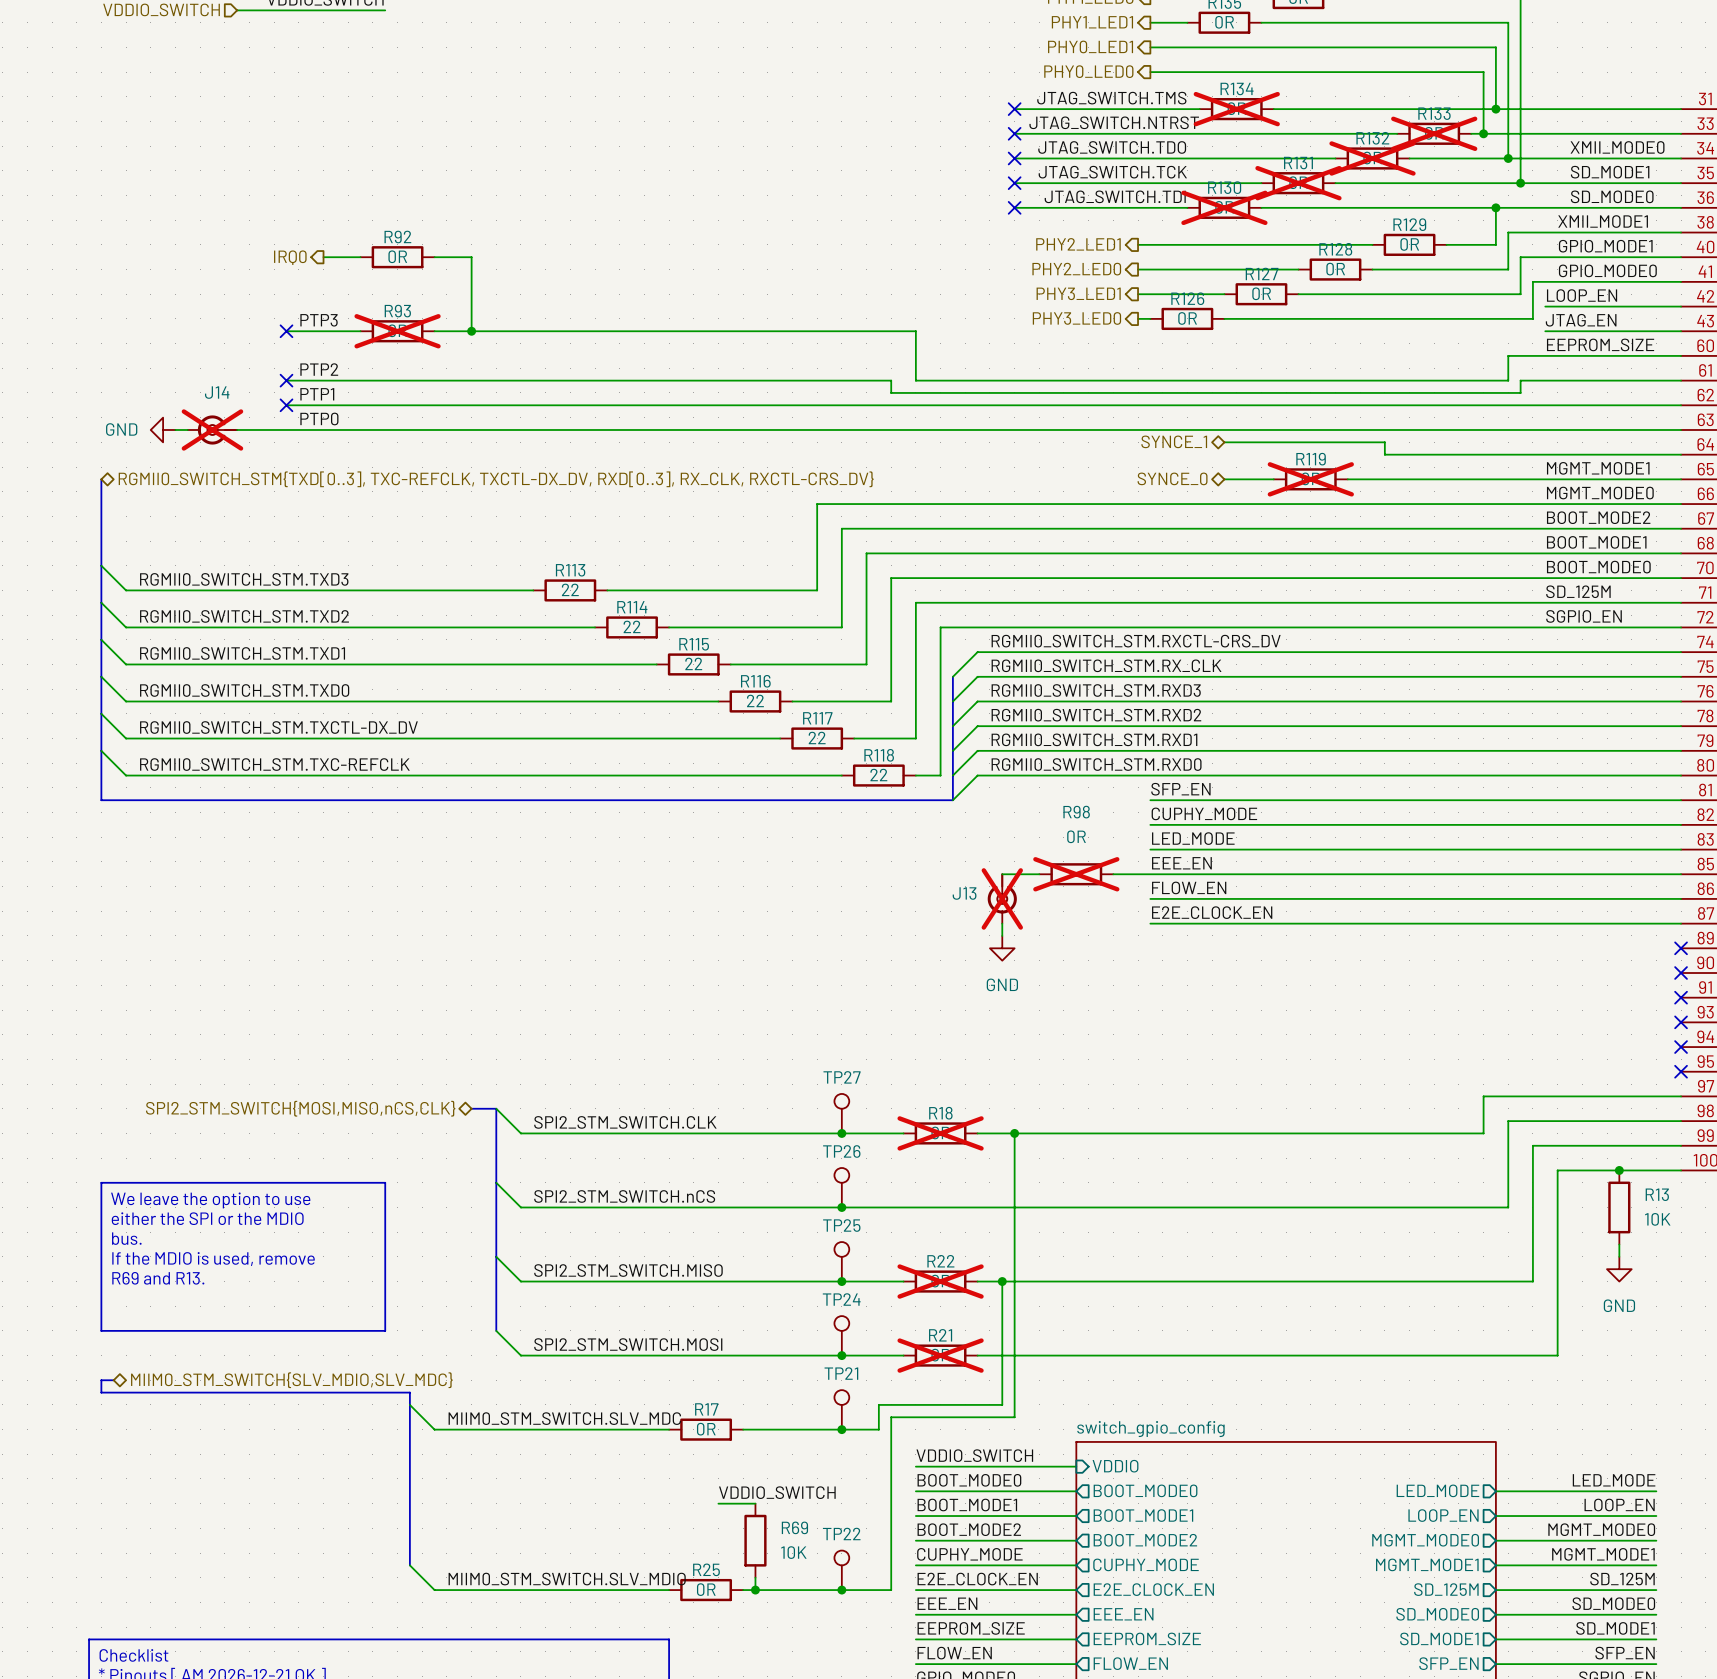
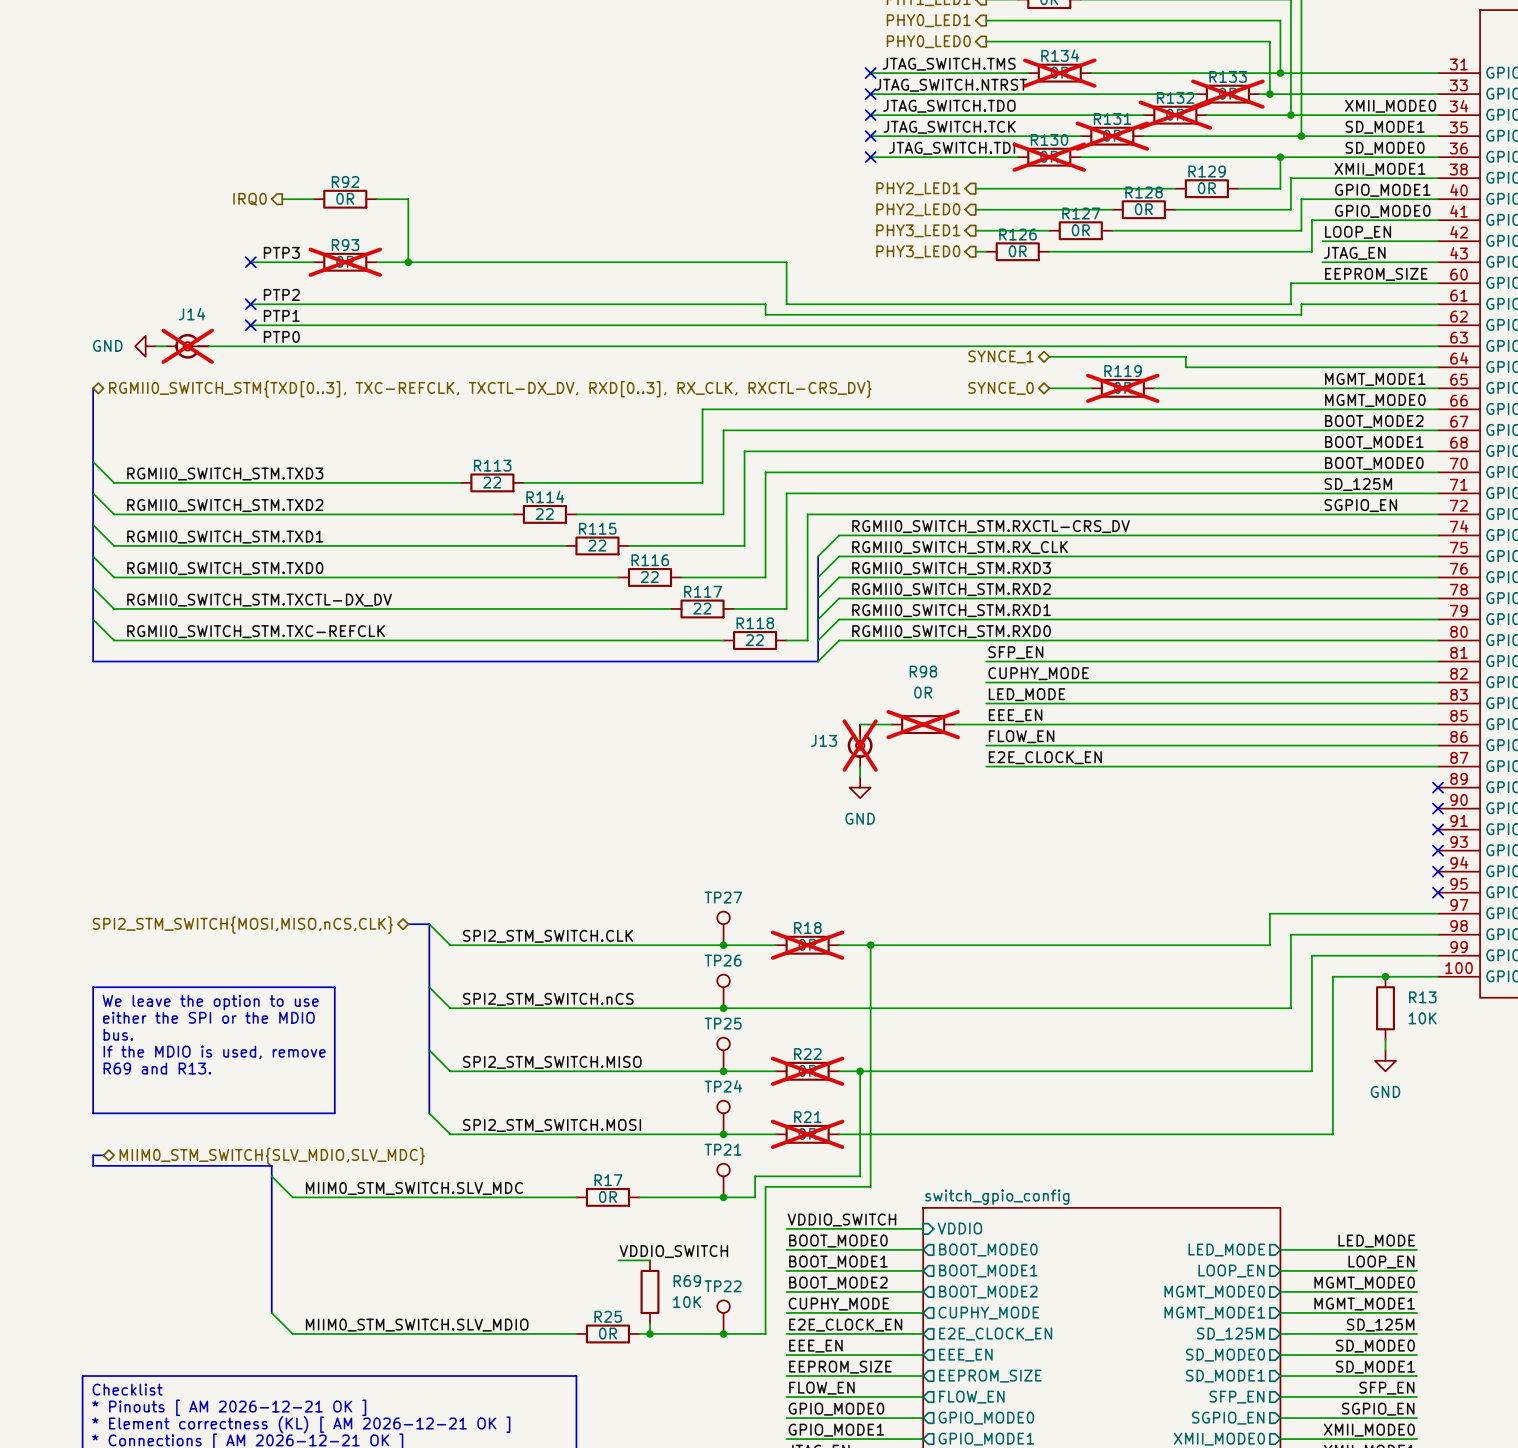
bus: (311, 1392) (409, 1392) (409, 1565) -> (271, 1165) (271, 1312)
wire: (409, 1404) (434, 1429) -> (271, 1176) (292, 1197) (376, 1197)
label position: MIIM0_STM_SWITCH.SLV_MDC (564, 1418) -> MIIM0_STM_SWITCH.SLV_MDC (414, 1188)
wire: (409, 1565) (434, 1590) -> (271, 1312) (292, 1333) (376, 1333)
label position: MIIM0_STM_SWITCH.SLV_MDIO (567, 1579) -> MIIM0_STM_SWITCH.SLV_MDIO (417, 1325)

